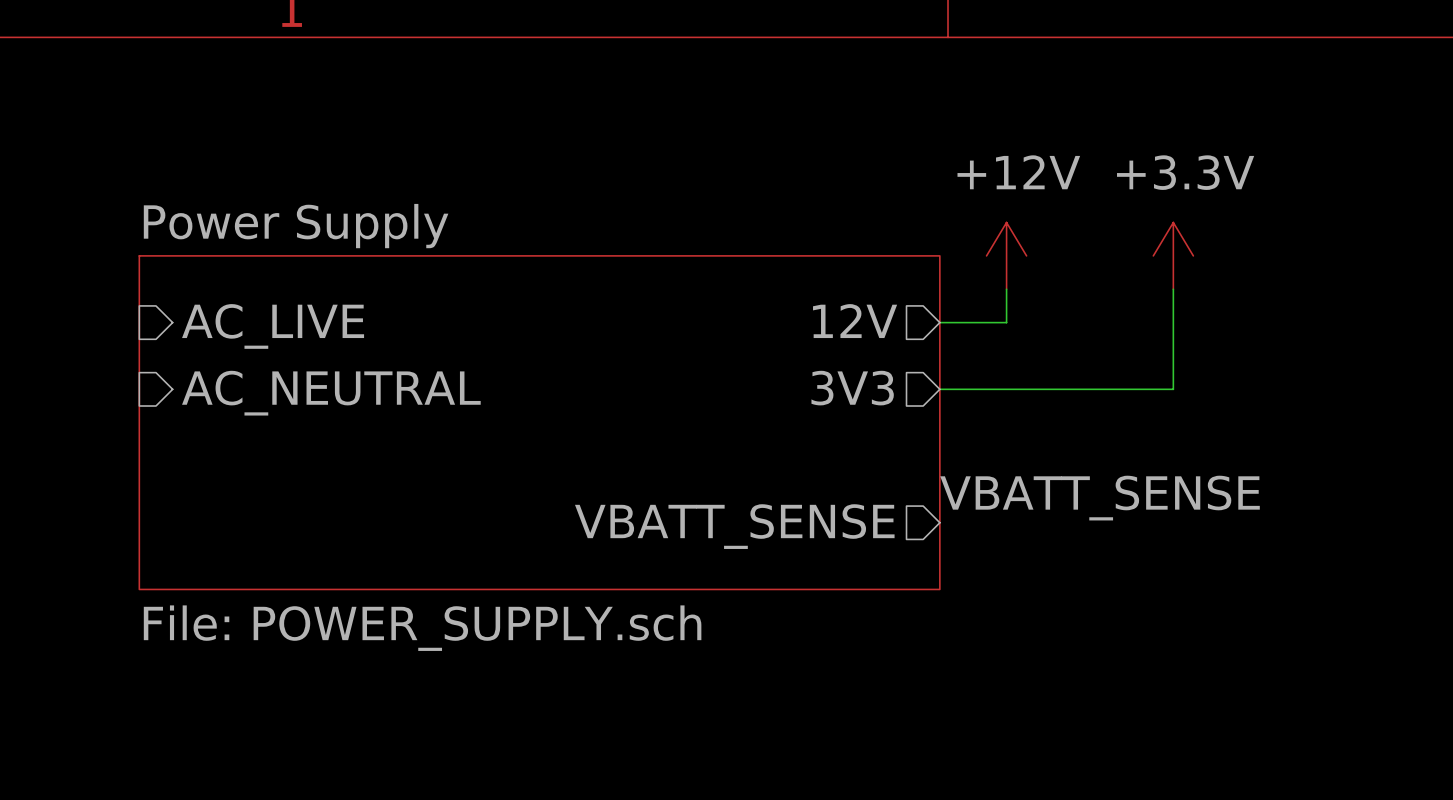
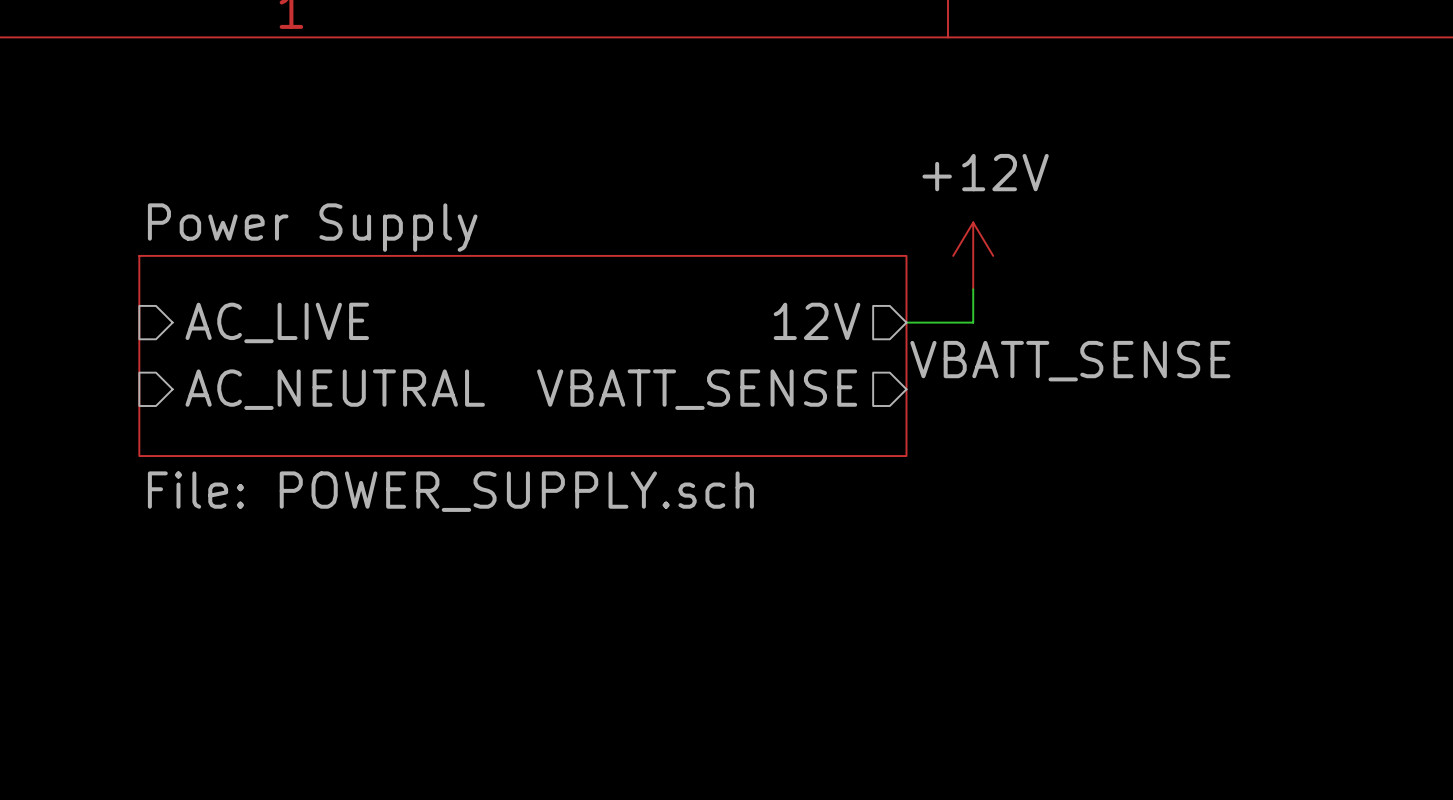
power symbol position: +12V (1006, 255) -> +12V (973, 255)
power symbol: +3.3V (1173, 255) -> none
wire: (1006, 289) (1006, 322) (973, 322) -> (973, 289) (973, 322)
wire: (1173, 289) (1173, 389) (939, 389) -> none
sheet pin position: 12V (855, 321) -> 12V (817, 321)
wire: none -> (906, 322) (939, 322)
sheet Power Supply: none -> File: POWER_SUPPLY.sch (522, 355)
sheet pin: 3V3 (852, 388) -> none
sheet Power Supply: File: POWER_SUPPLY.sch (539, 422) -> none
label position: VBATT_SENSE (1100, 498) -> VBATT_SENSE (1070, 361)
sheet pin position: VBATT_SENSE (734, 526) -> VBATT_SENSE (697, 389)

